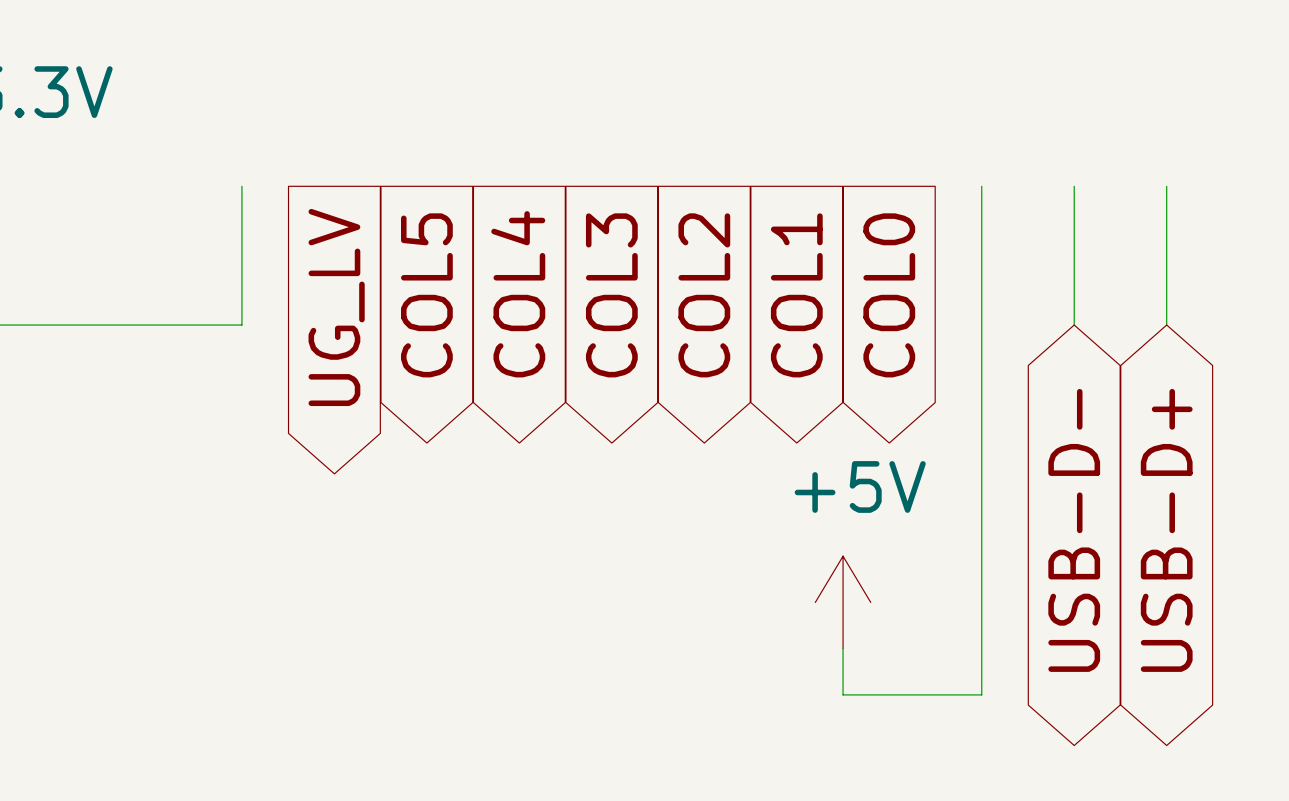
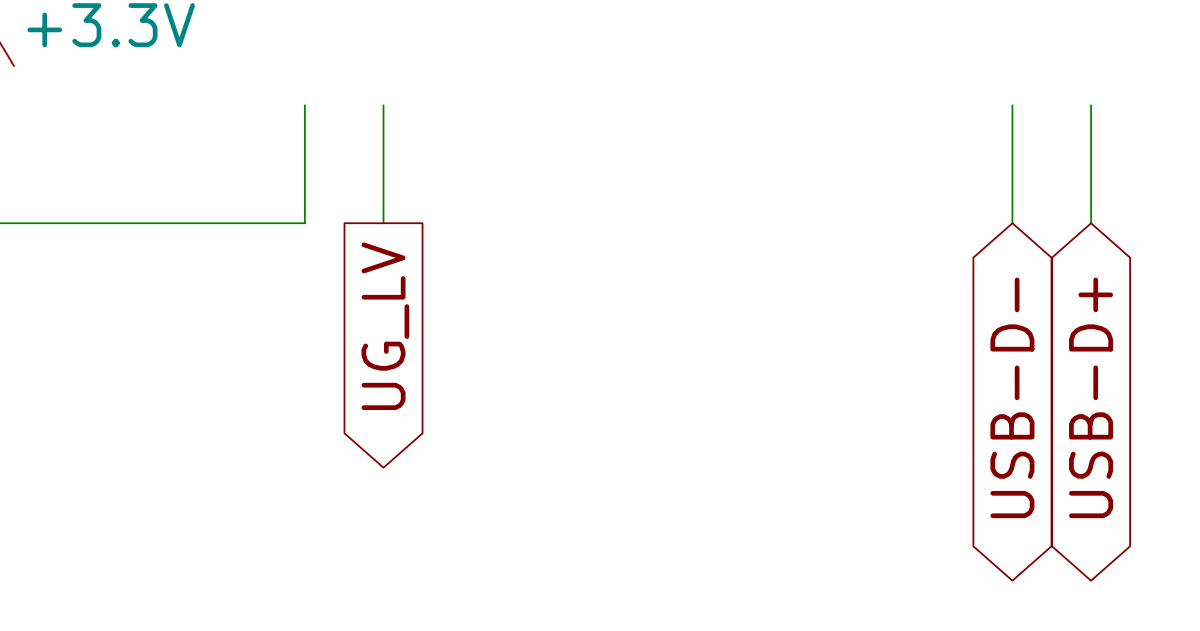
wire: none -> (383, 105) (383, 223)
wire: (981, 186) (981, 694) (843, 694) (843, 648) -> none
global label: COL4 (518, 294) -> none
global label: COL5 (426, 295) -> none
global label: COL3 (611, 295) -> none
global label: COL2 (704, 295) -> none
global label: COL1 (796, 295) -> none
global label: COL0 (889, 295) -> none
global label position: UG_LV (336, 307) -> UG_LV (385, 326)
power symbol: +5V (843, 602) -> none

